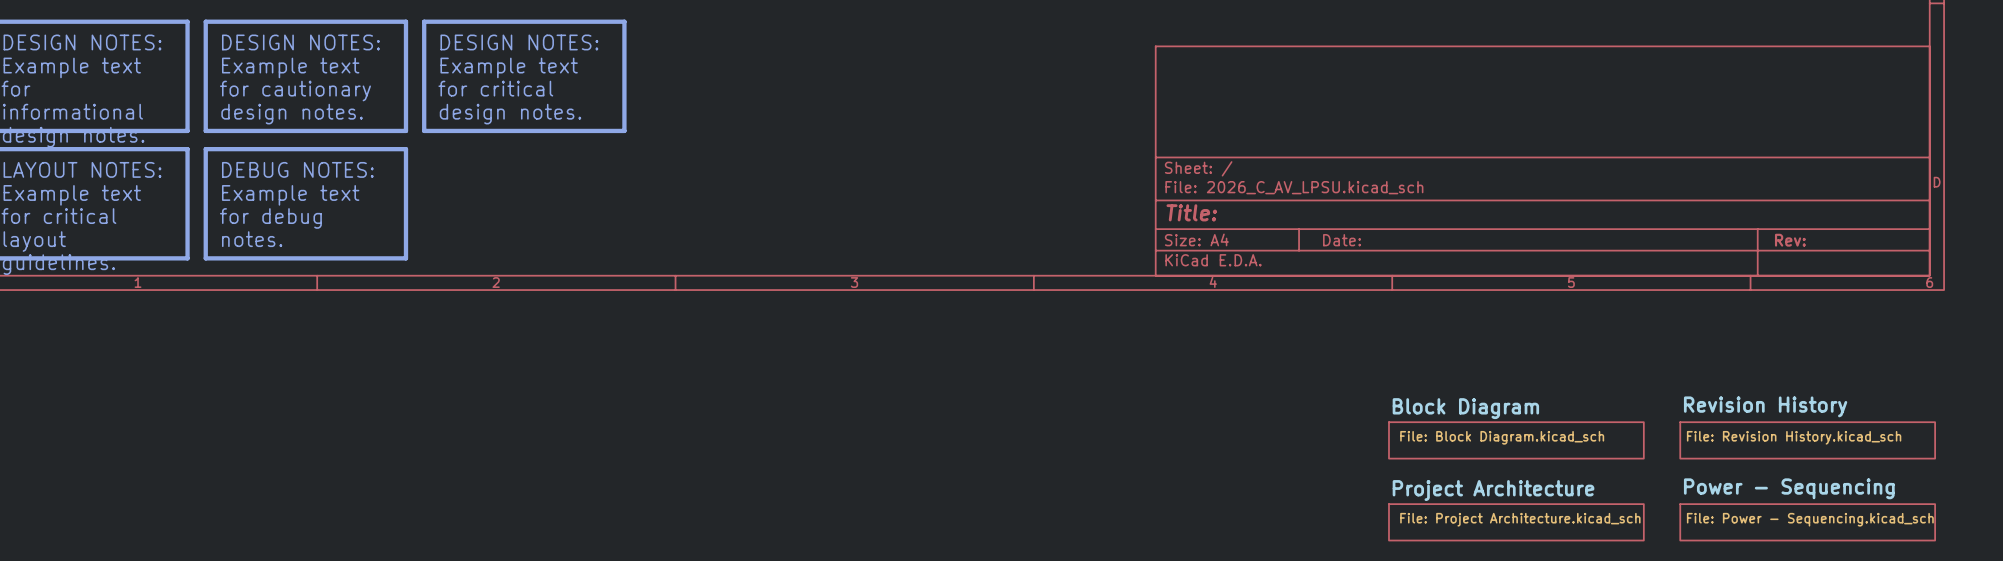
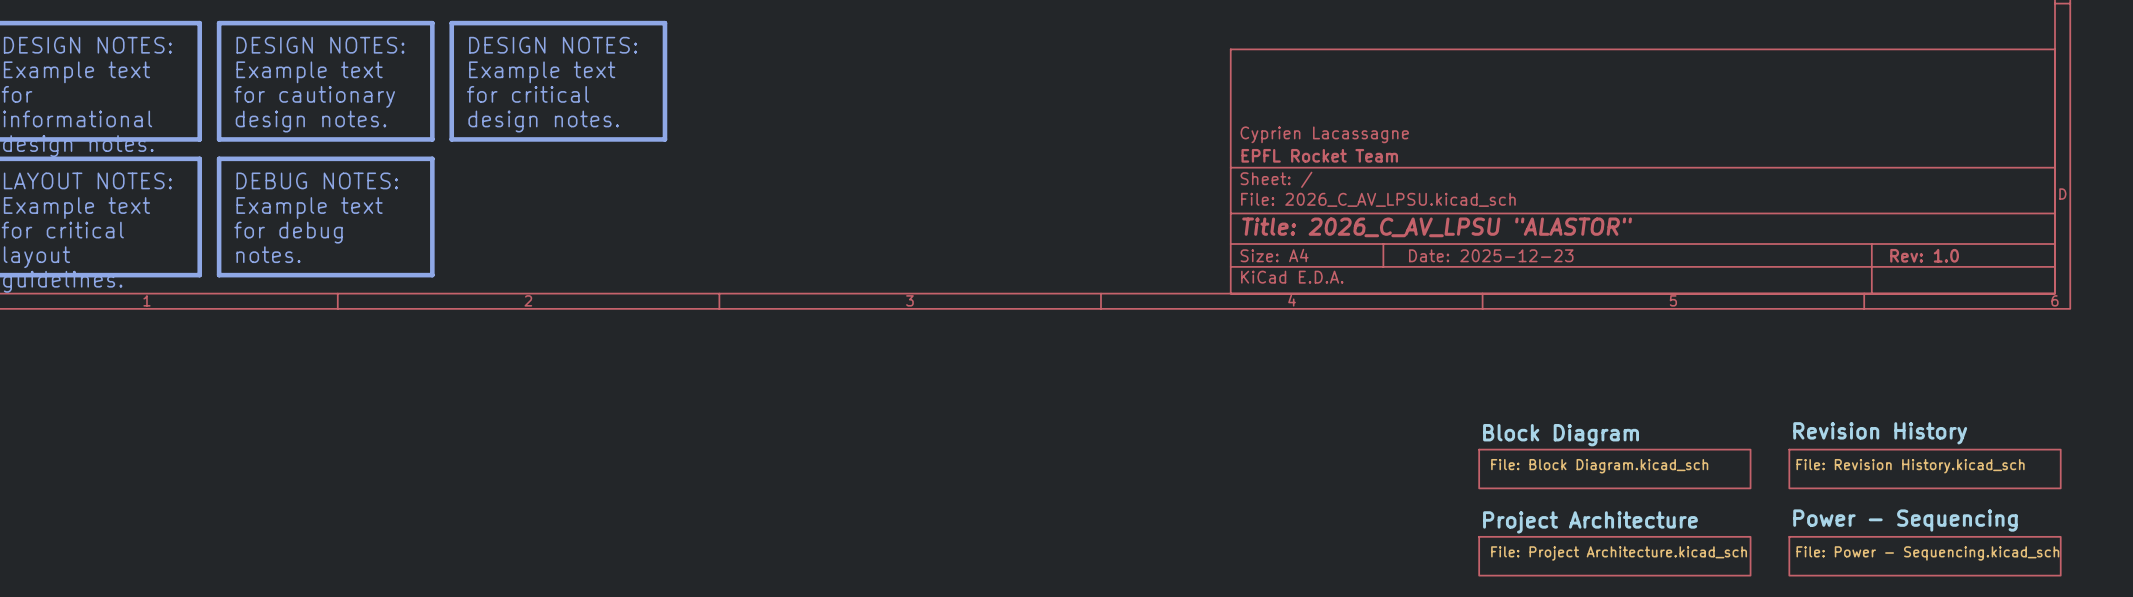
title block: none -> Cyprien Lacassagne (1324, 134)
title block: none -> EPFL Rocket Team (1319, 155)
title block: Title: (1191, 212) -> Title: 2026_C_AV_LPSU "ALASTOR" (1437, 227)
title block: Date: (1342, 240) -> Date: 2025-12-23 (1491, 255)
title block: Rev: (1790, 240) -> Rev: 1.0 (1924, 255)

